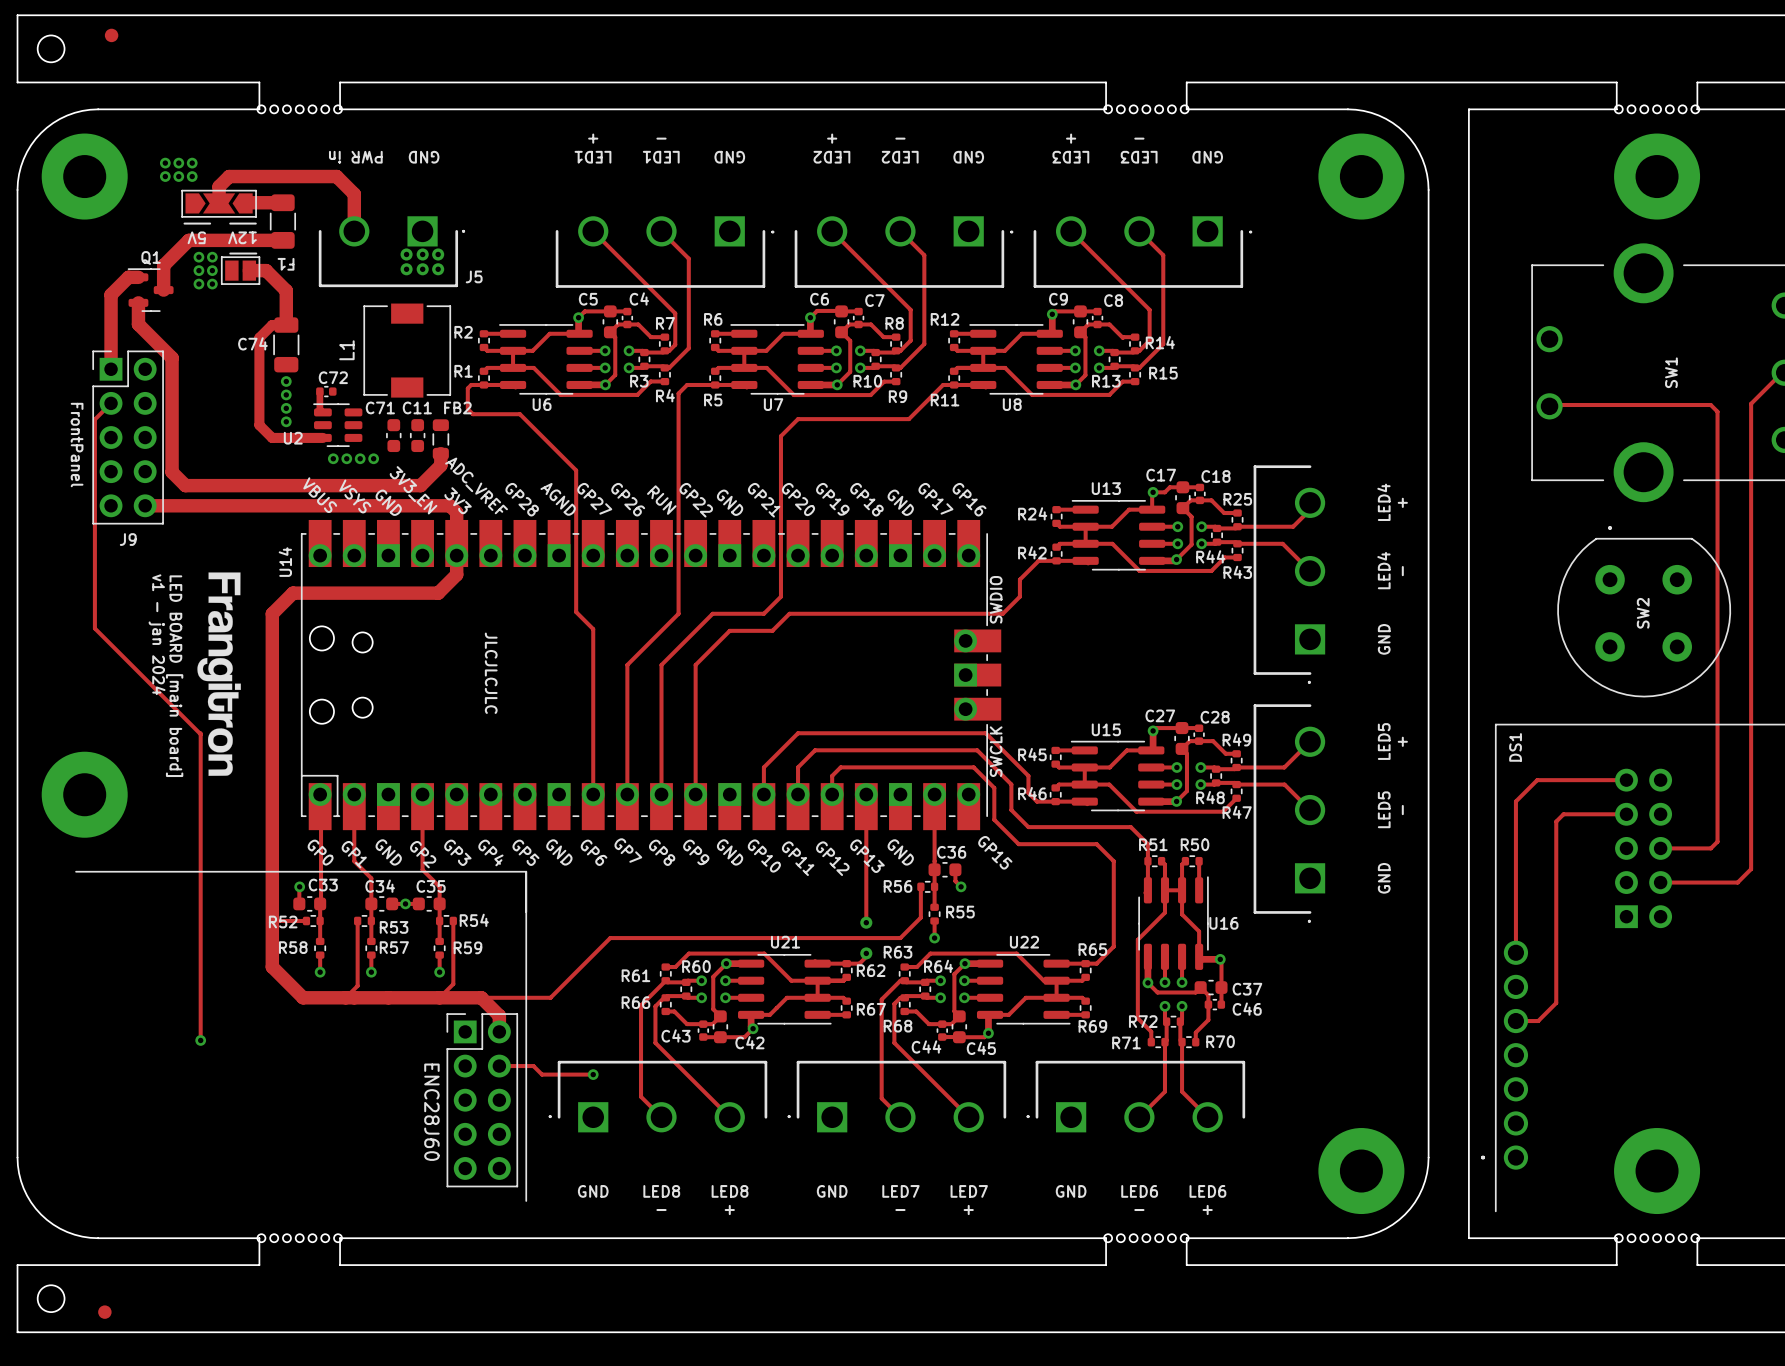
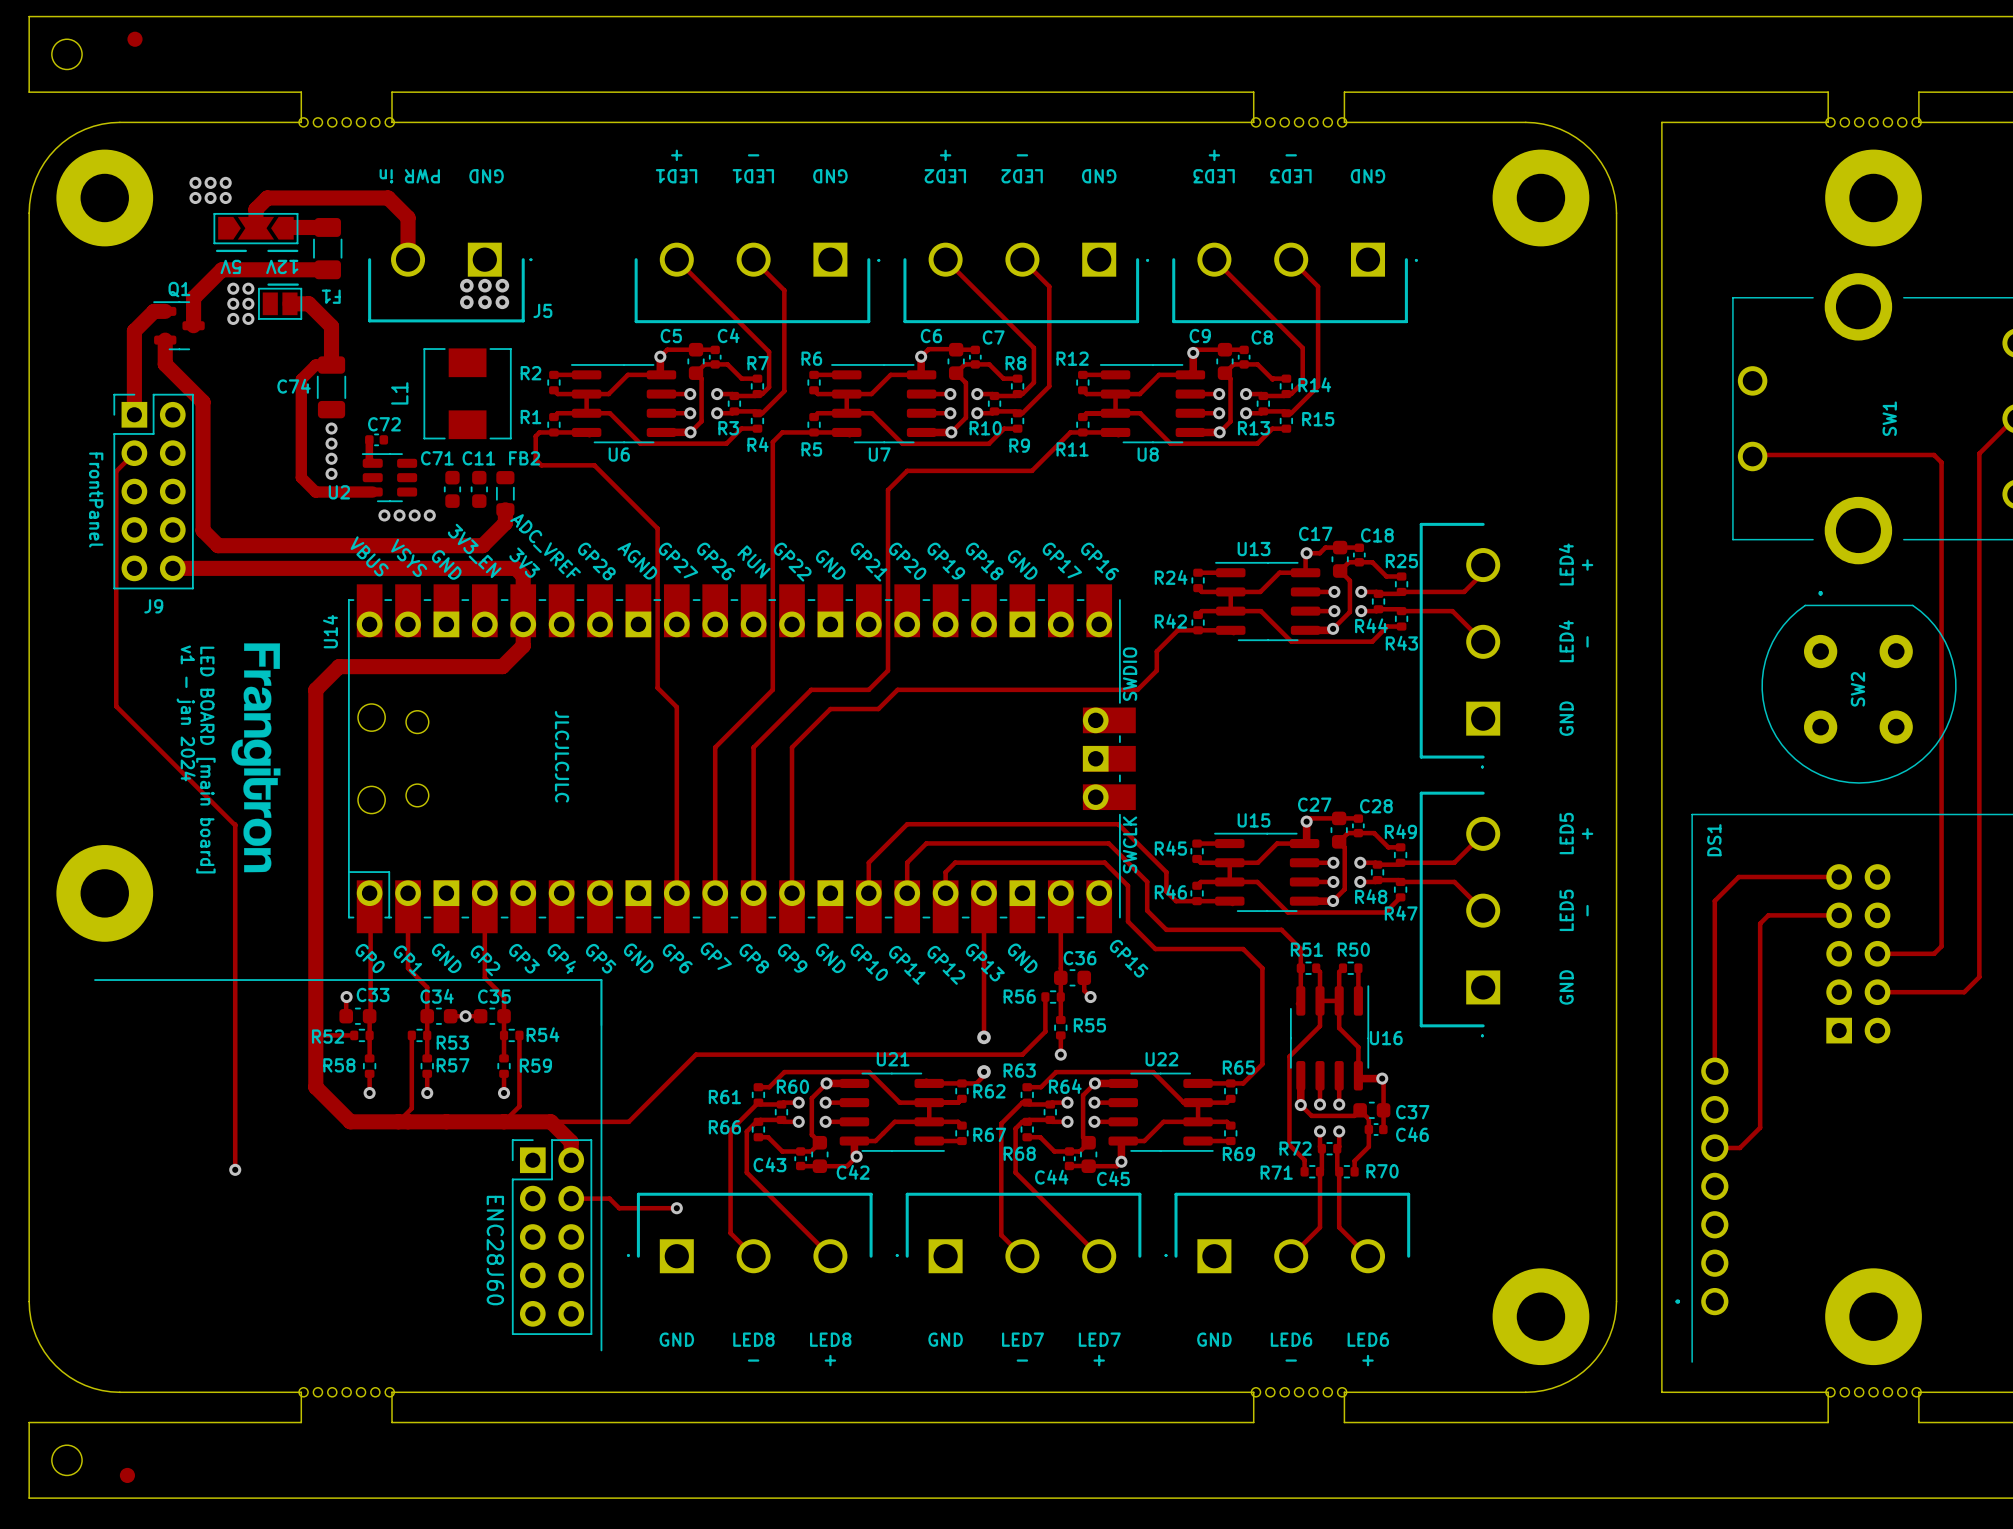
L1 footprint: [363, 303, 452, 398] -> [423, 348, 512, 440]

